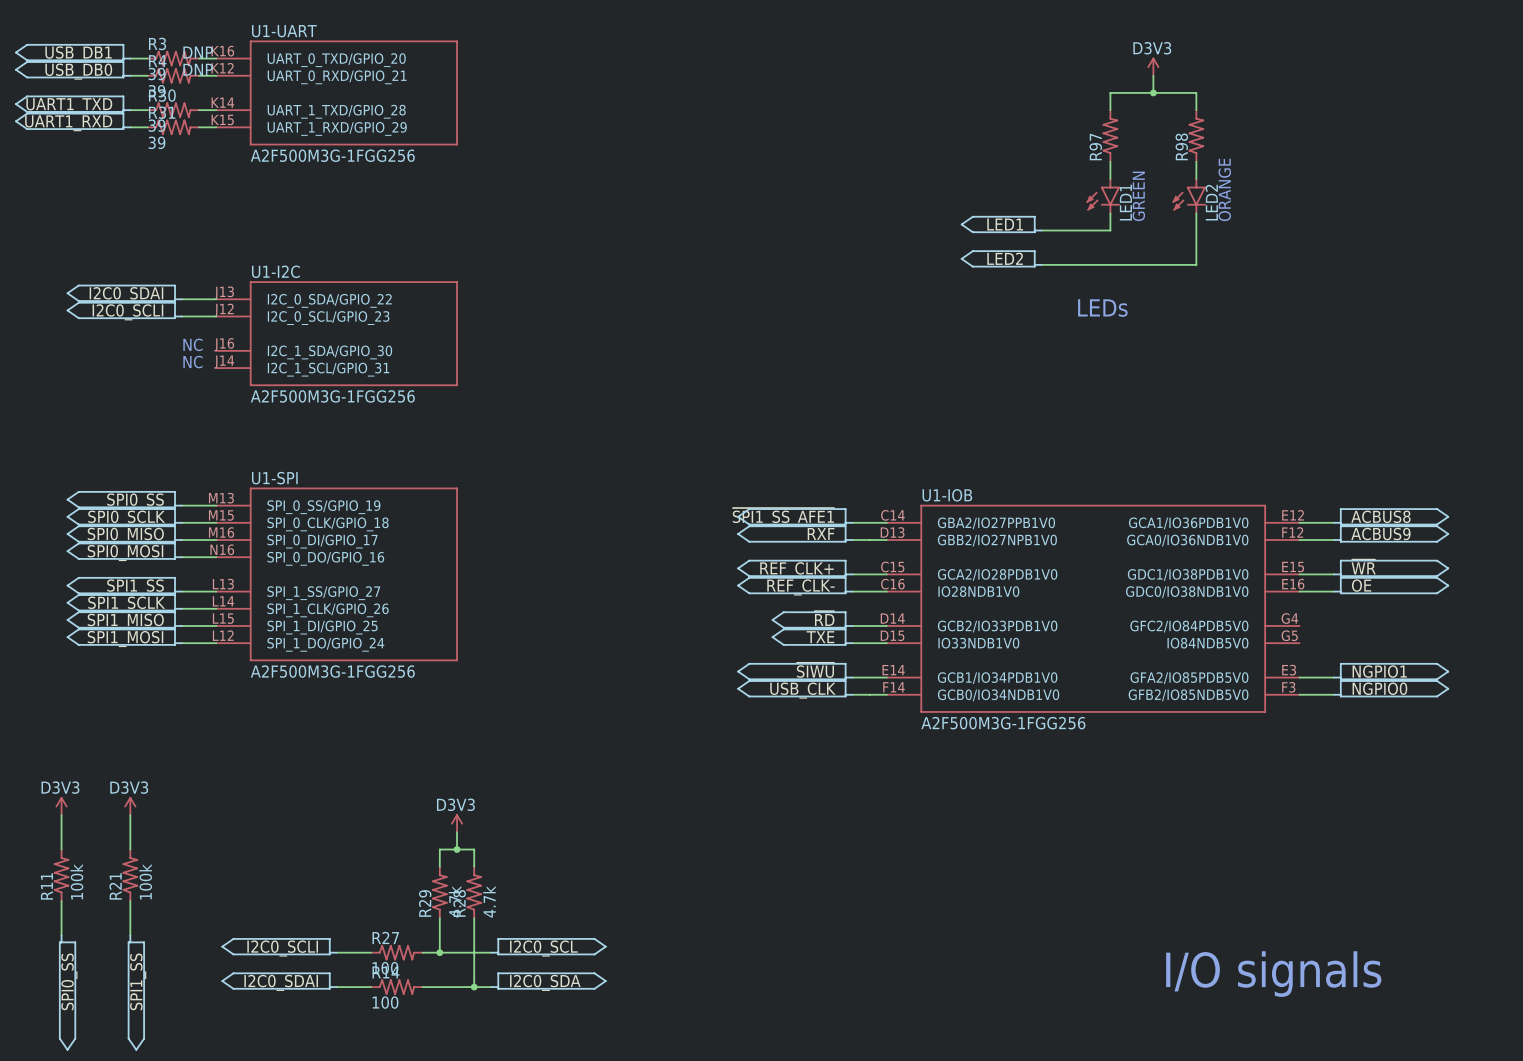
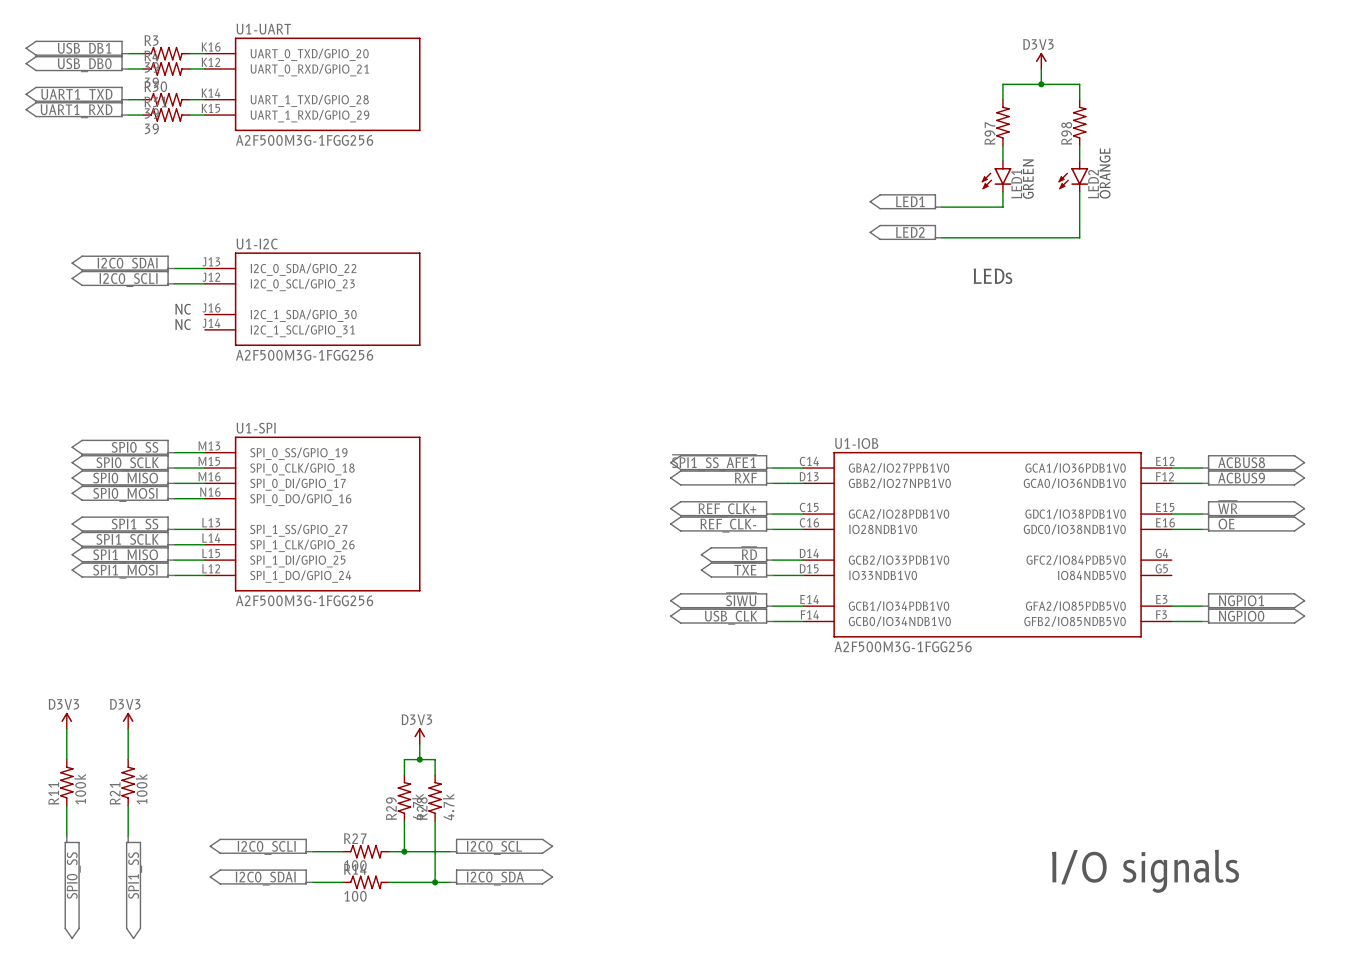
R3 text: DNP (198, 52) -> none
R4 text: DNP (198, 69) -> none

